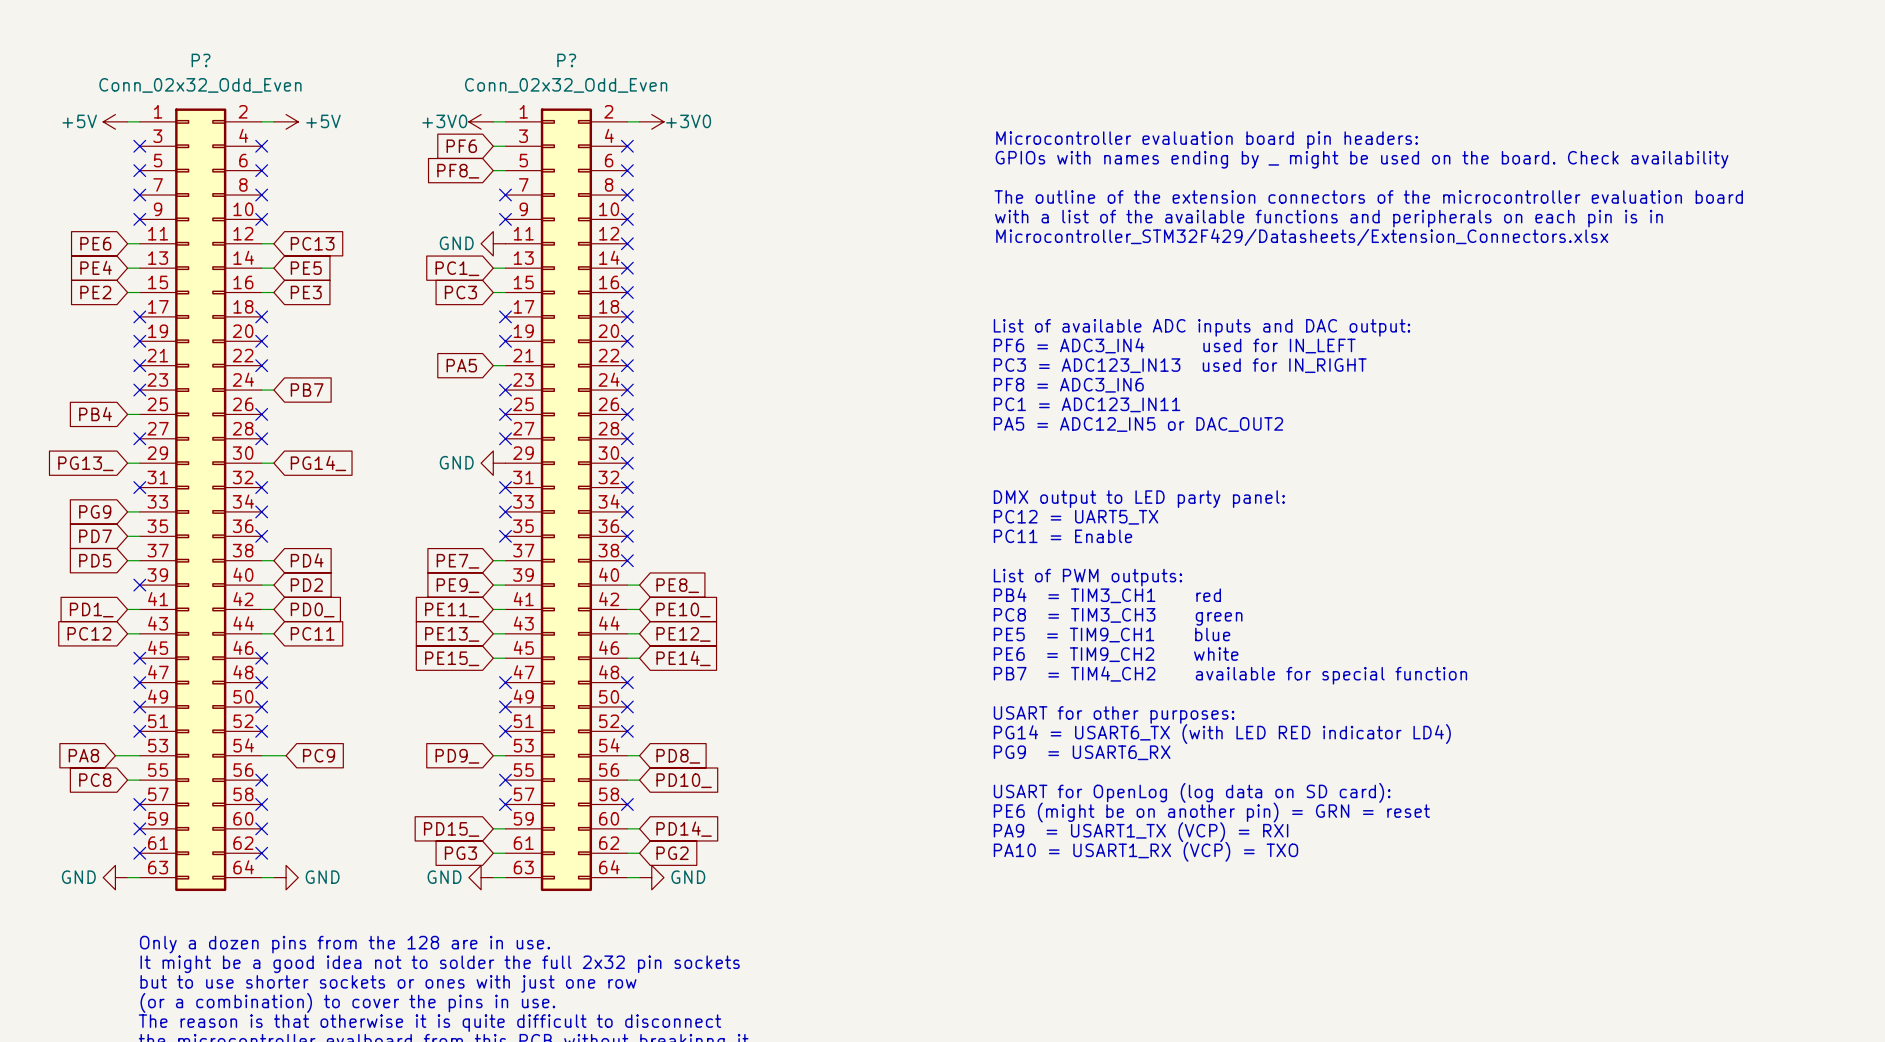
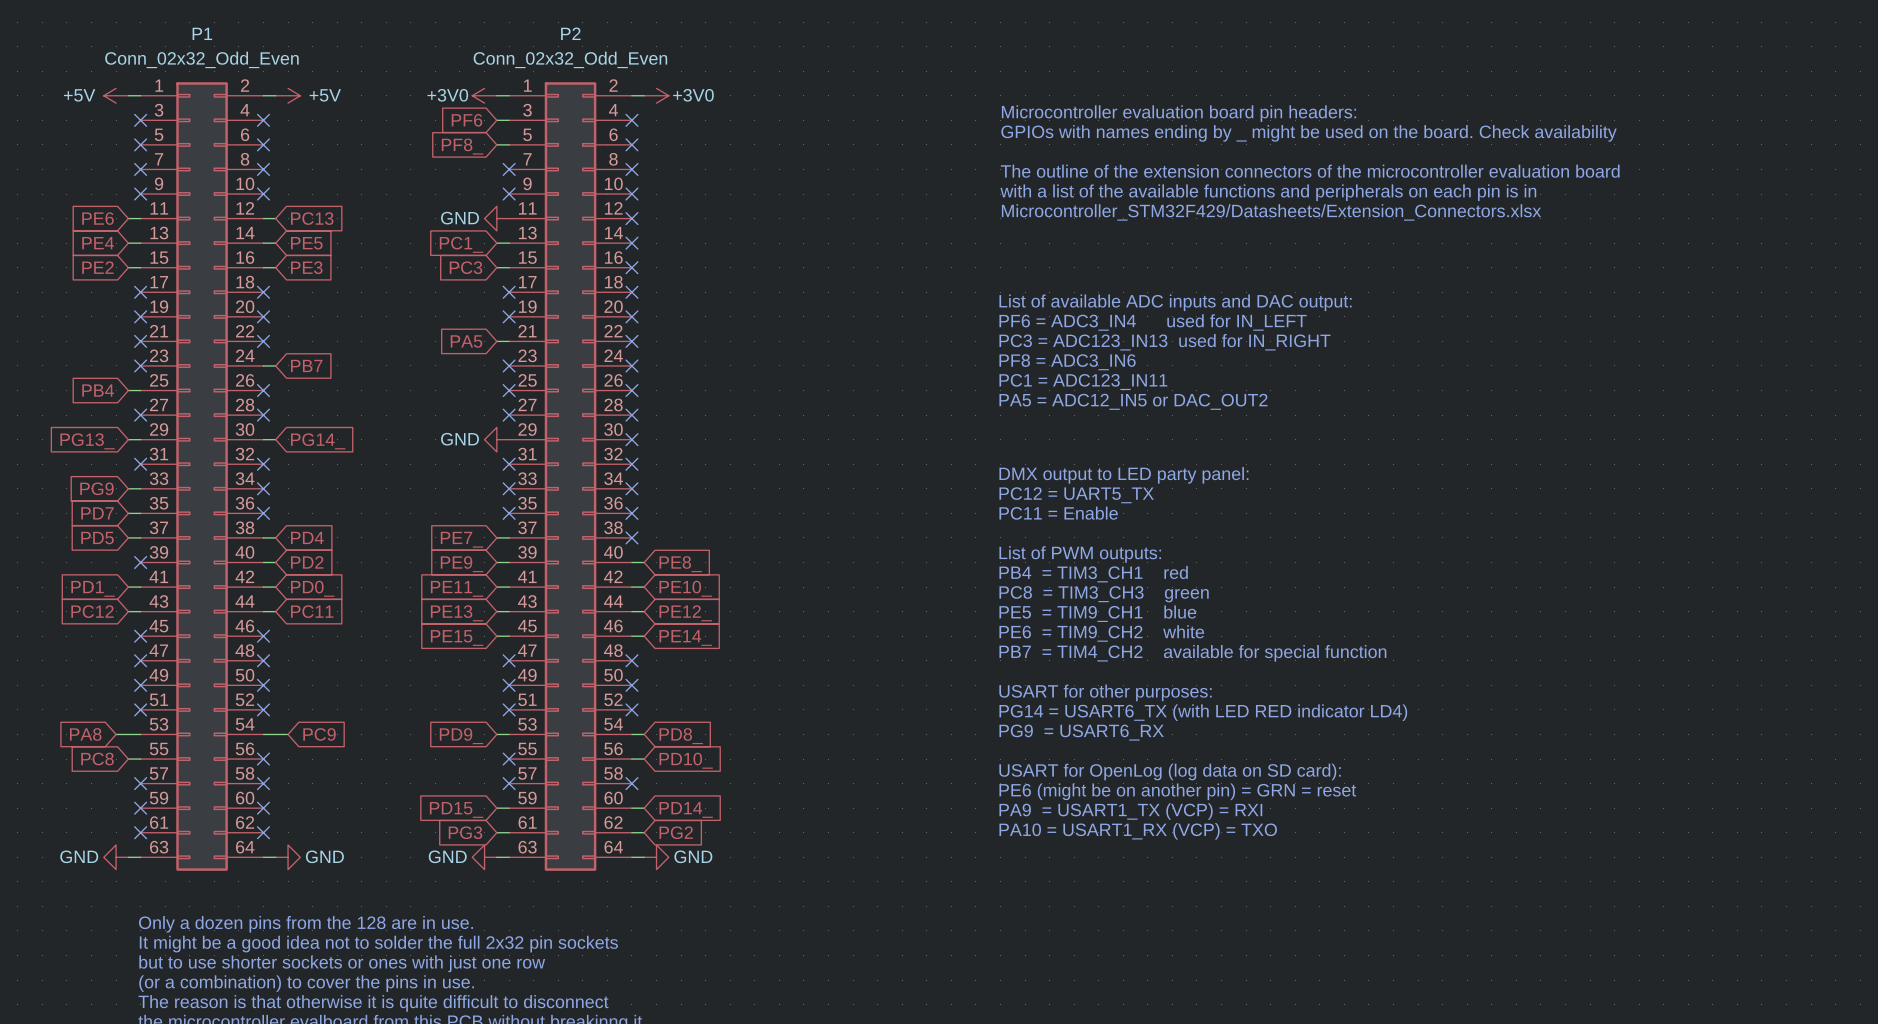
P? name: P? (201, 60) -> P1 (202, 33)
P? name: P? (566, 60) -> P2 (570, 33)

